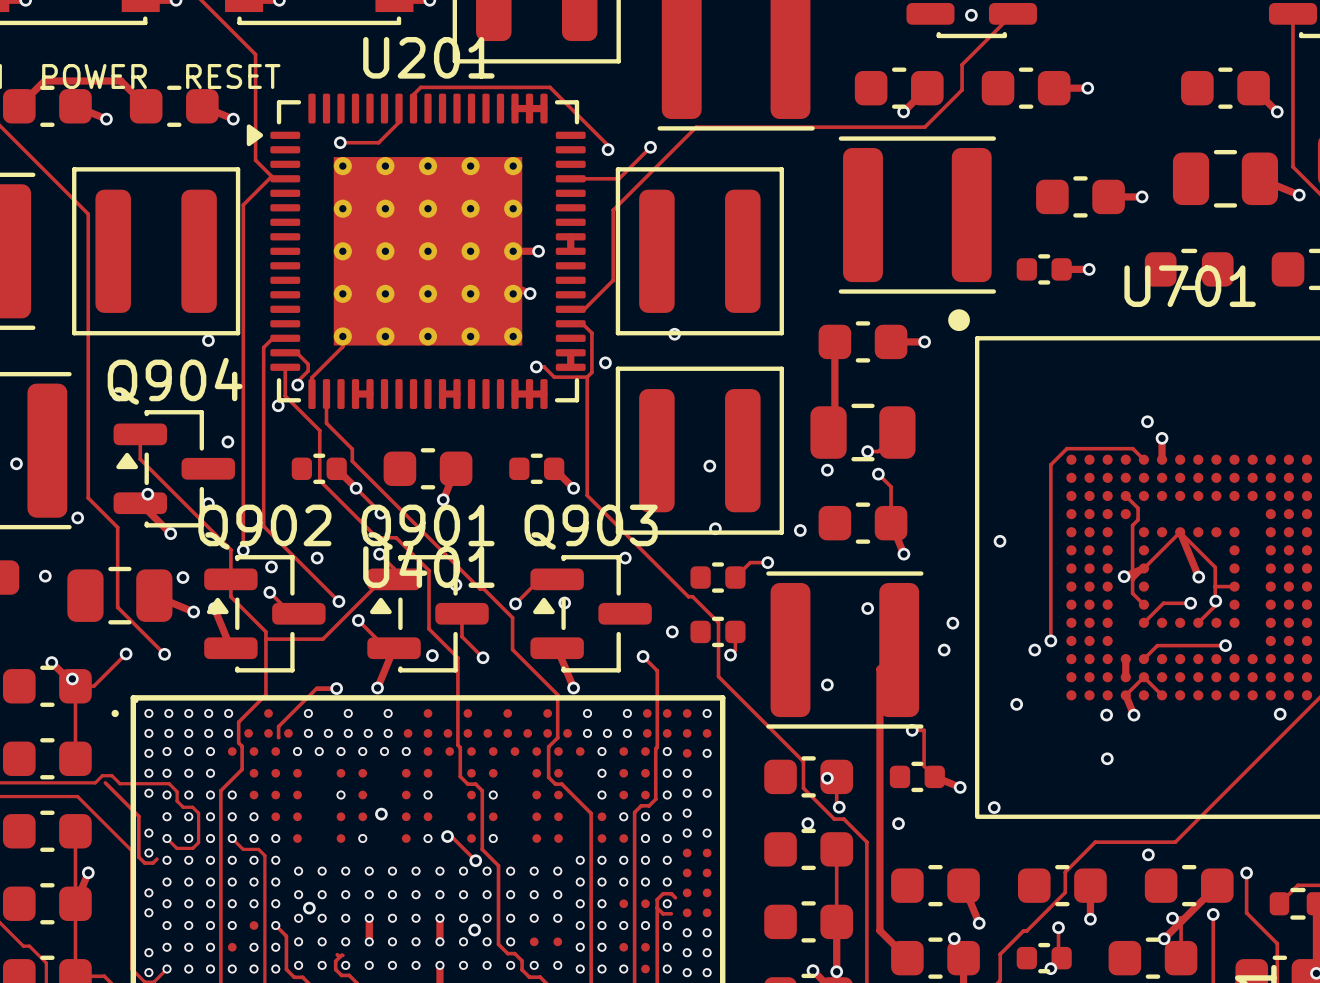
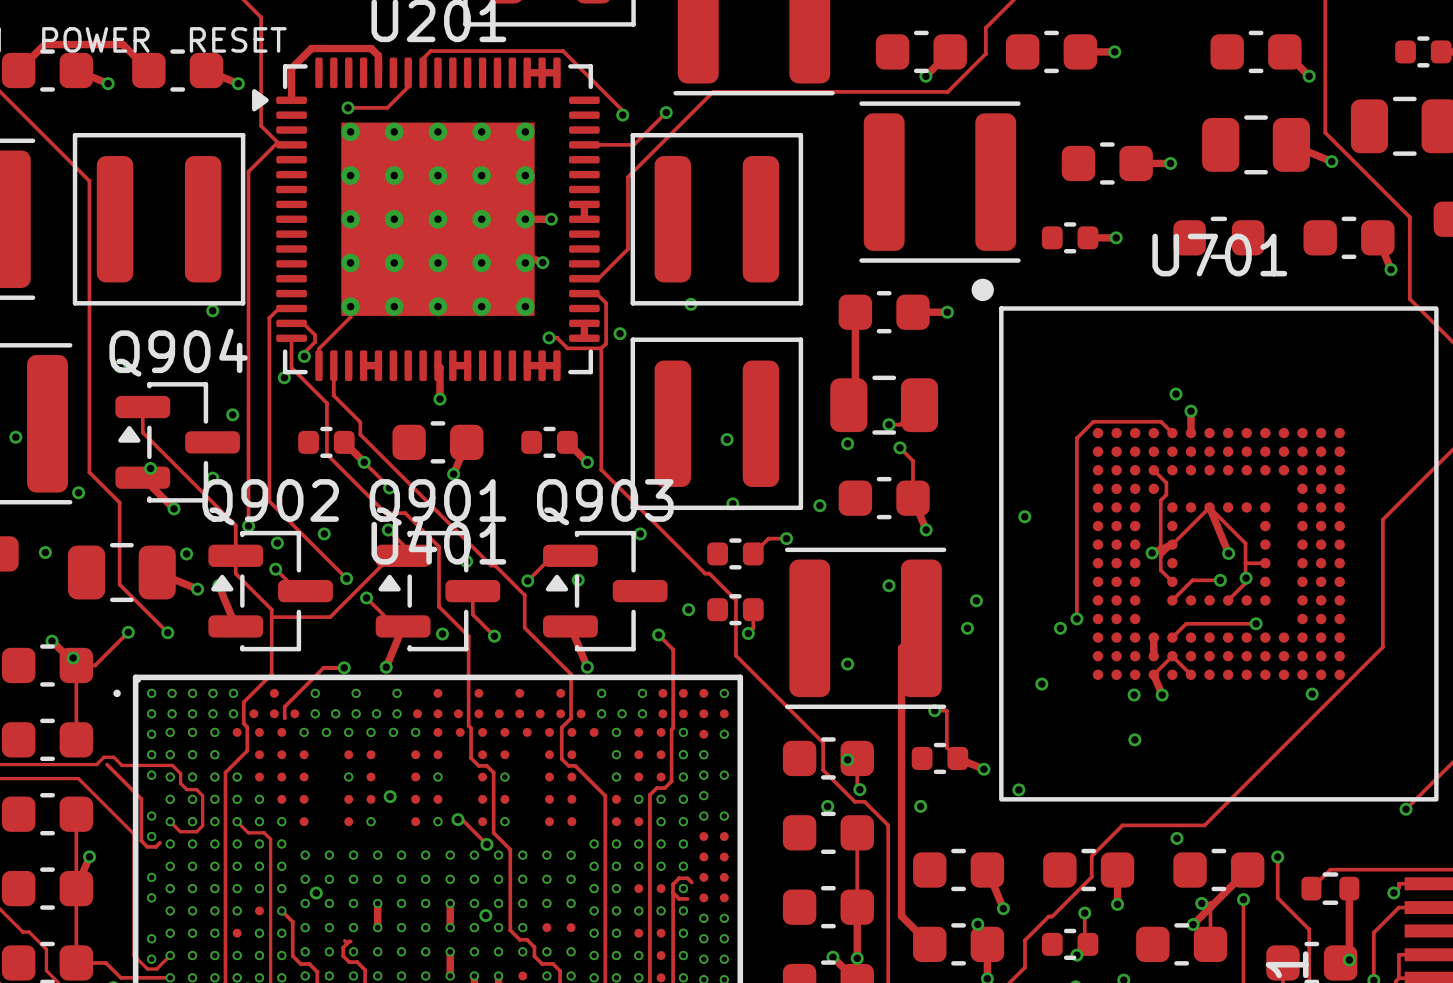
track: none -> (378, 72) (378, 55) (371, 48) (311, 48) (291, 68) (291, 100)
track: none -> (437, 365) (439, 367) (439, 399)
via: none -> (439, 399)

